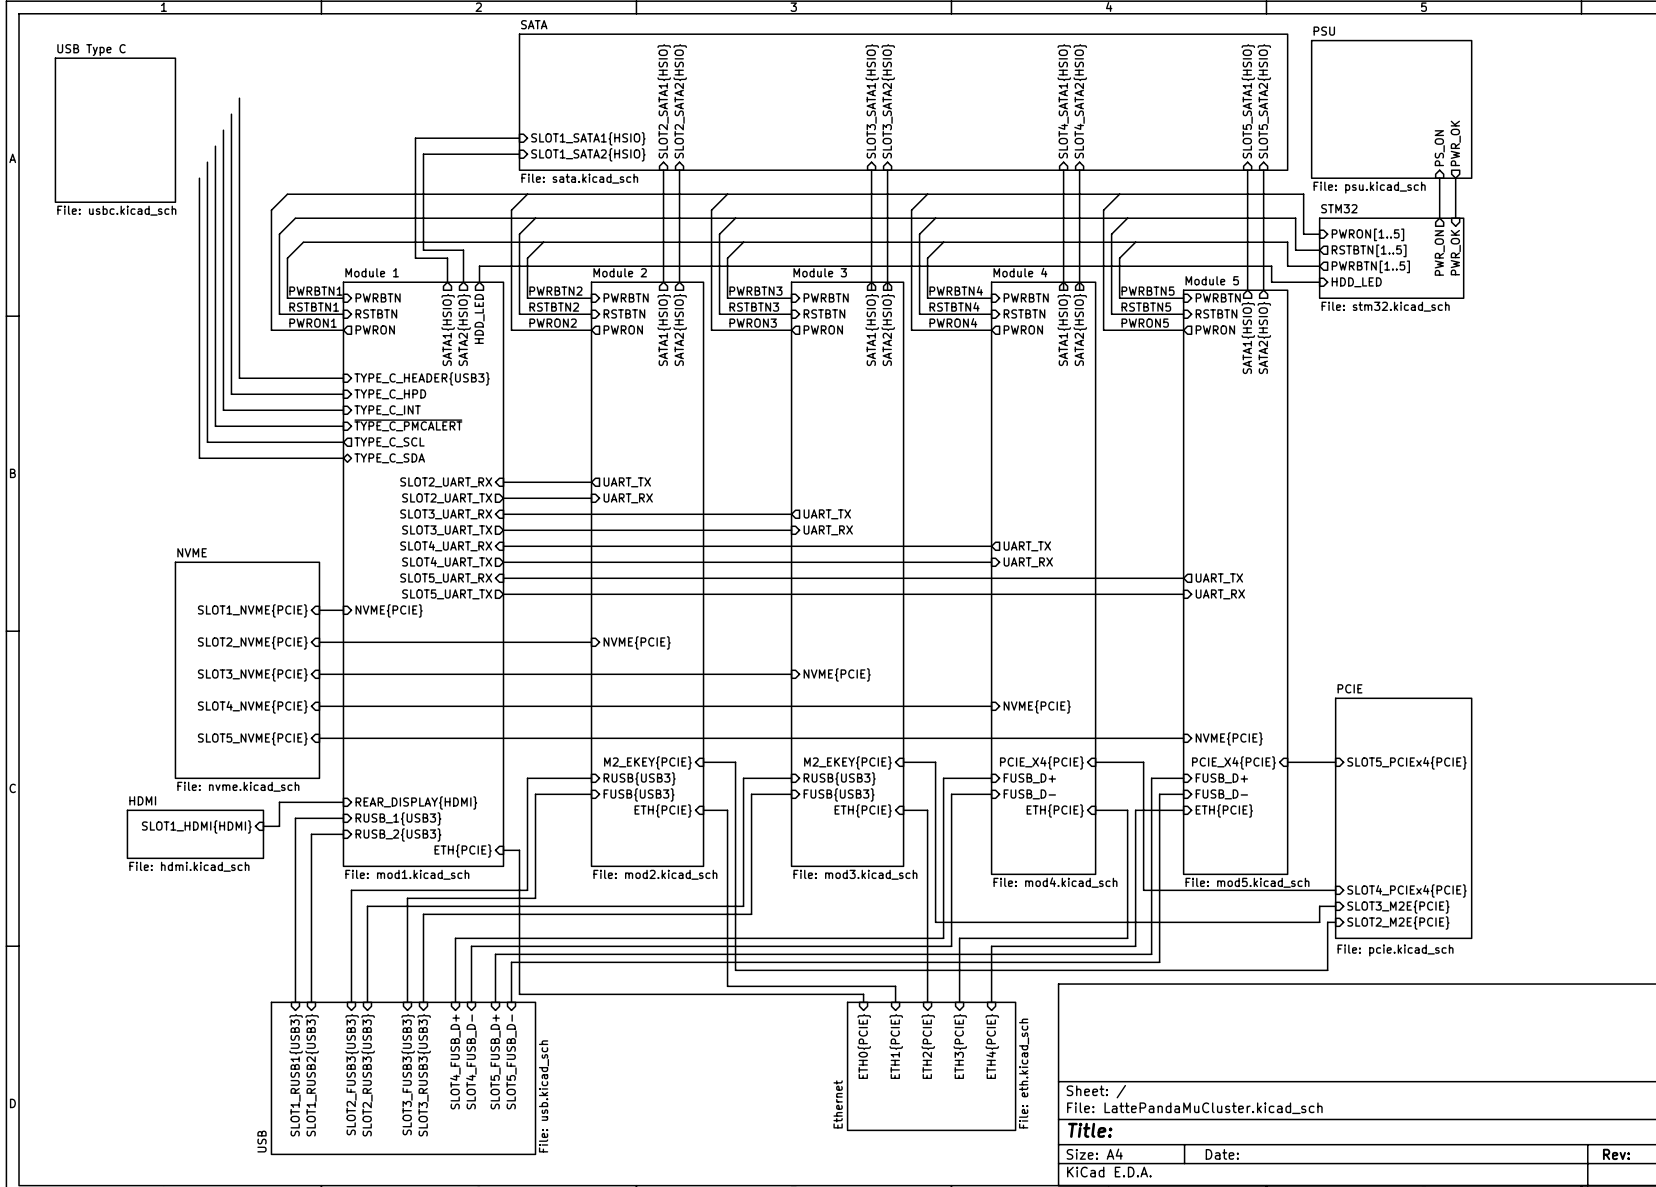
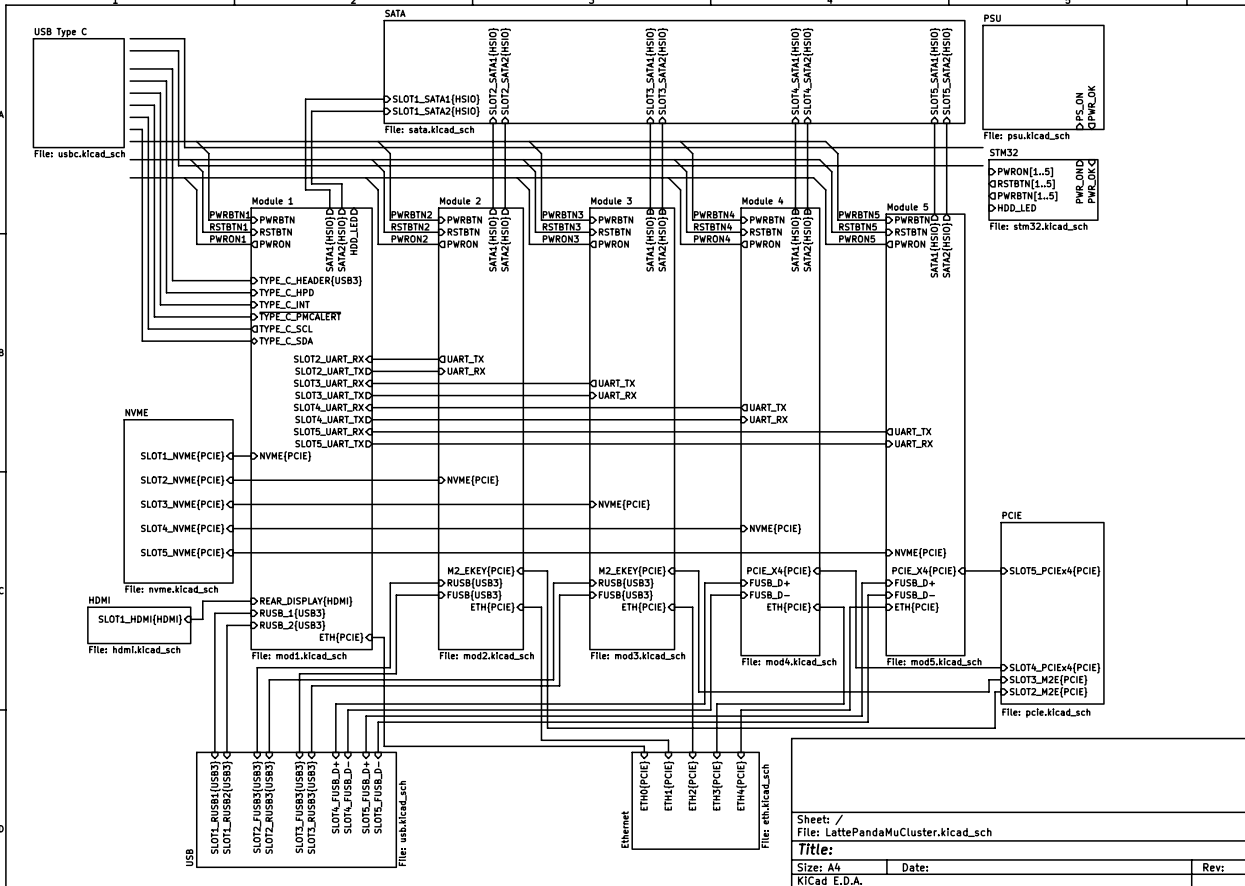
wire: none -> (130, 38) (184, 38) (184, 147) (982, 147)
wire: none -> (130, 50) (178, 50) (178, 165) (982, 165)
bus: none -> (130, 68) (172, 68)
wire: none -> (130, 81) (166, 81)
wire: none -> (130, 93) (160, 93)
wire: none -> (130, 105) (154, 105)
wire: none -> (130, 117) (148, 117)
wire: none -> (130, 129) (142, 129)
wire: (1439, 178) (1439, 218) -> none
wire: (1455, 178) (1455, 218) -> none
bus: none -> (130, 141) (208, 141)
wire: (287, 194) (271, 210) (271, 258) -> (184, 177) (196, 189)
wire: (527, 194) (511, 210) (511, 258) -> (366, 177) (378, 189)
wire: (727, 194) (711, 210) (711, 258) -> (517, 177) (529, 189)
wire: (927, 194) (911, 210) (911, 258) -> (668, 177) (680, 189)
bus: (1103, 194) (1303, 194) (1303, 234) (1319, 234) -> none
wire: (1119, 194) (1103, 210) (1103, 258) -> (813, 177) (825, 189)
bus: none -> (130, 159) (214, 159)
wire: (295, 218) (279, 234) -> (190, 159) (202, 171)
wire: (535, 218) (519, 234) -> (372, 159) (384, 171)
wire: (735, 218) (719, 234) -> (523, 159) (535, 171)
wire: (935, 218) (919, 234) -> (674, 159) (686, 171)
bus: (1095, 218) (1295, 218) (1295, 250) (1319, 250) -> none
wire: (1127, 218) (1111, 234) -> (819, 159) (831, 171)
bus: none -> (130, 177) (220, 177)
wire: (303, 242) (287, 258) -> (196, 141) (208, 153) (208, 189)
wire: (543, 242) (527, 258) -> (378, 141) (390, 153) (390, 189)
wire: (743, 242) (727, 258) -> (529, 141) (541, 153) (541, 189)
wire: (943, 242) (927, 258) -> (680, 141) (692, 153) (692, 189)
bus: (1087, 242) (1287, 242) (1287, 266) (1319, 266) -> none
wire: (1135, 242) (1119, 258) -> (825, 141) (837, 153) (837, 189)
wire: (479, 282) (479, 266) (1271, 266) (1271, 282) (1319, 282) -> none

